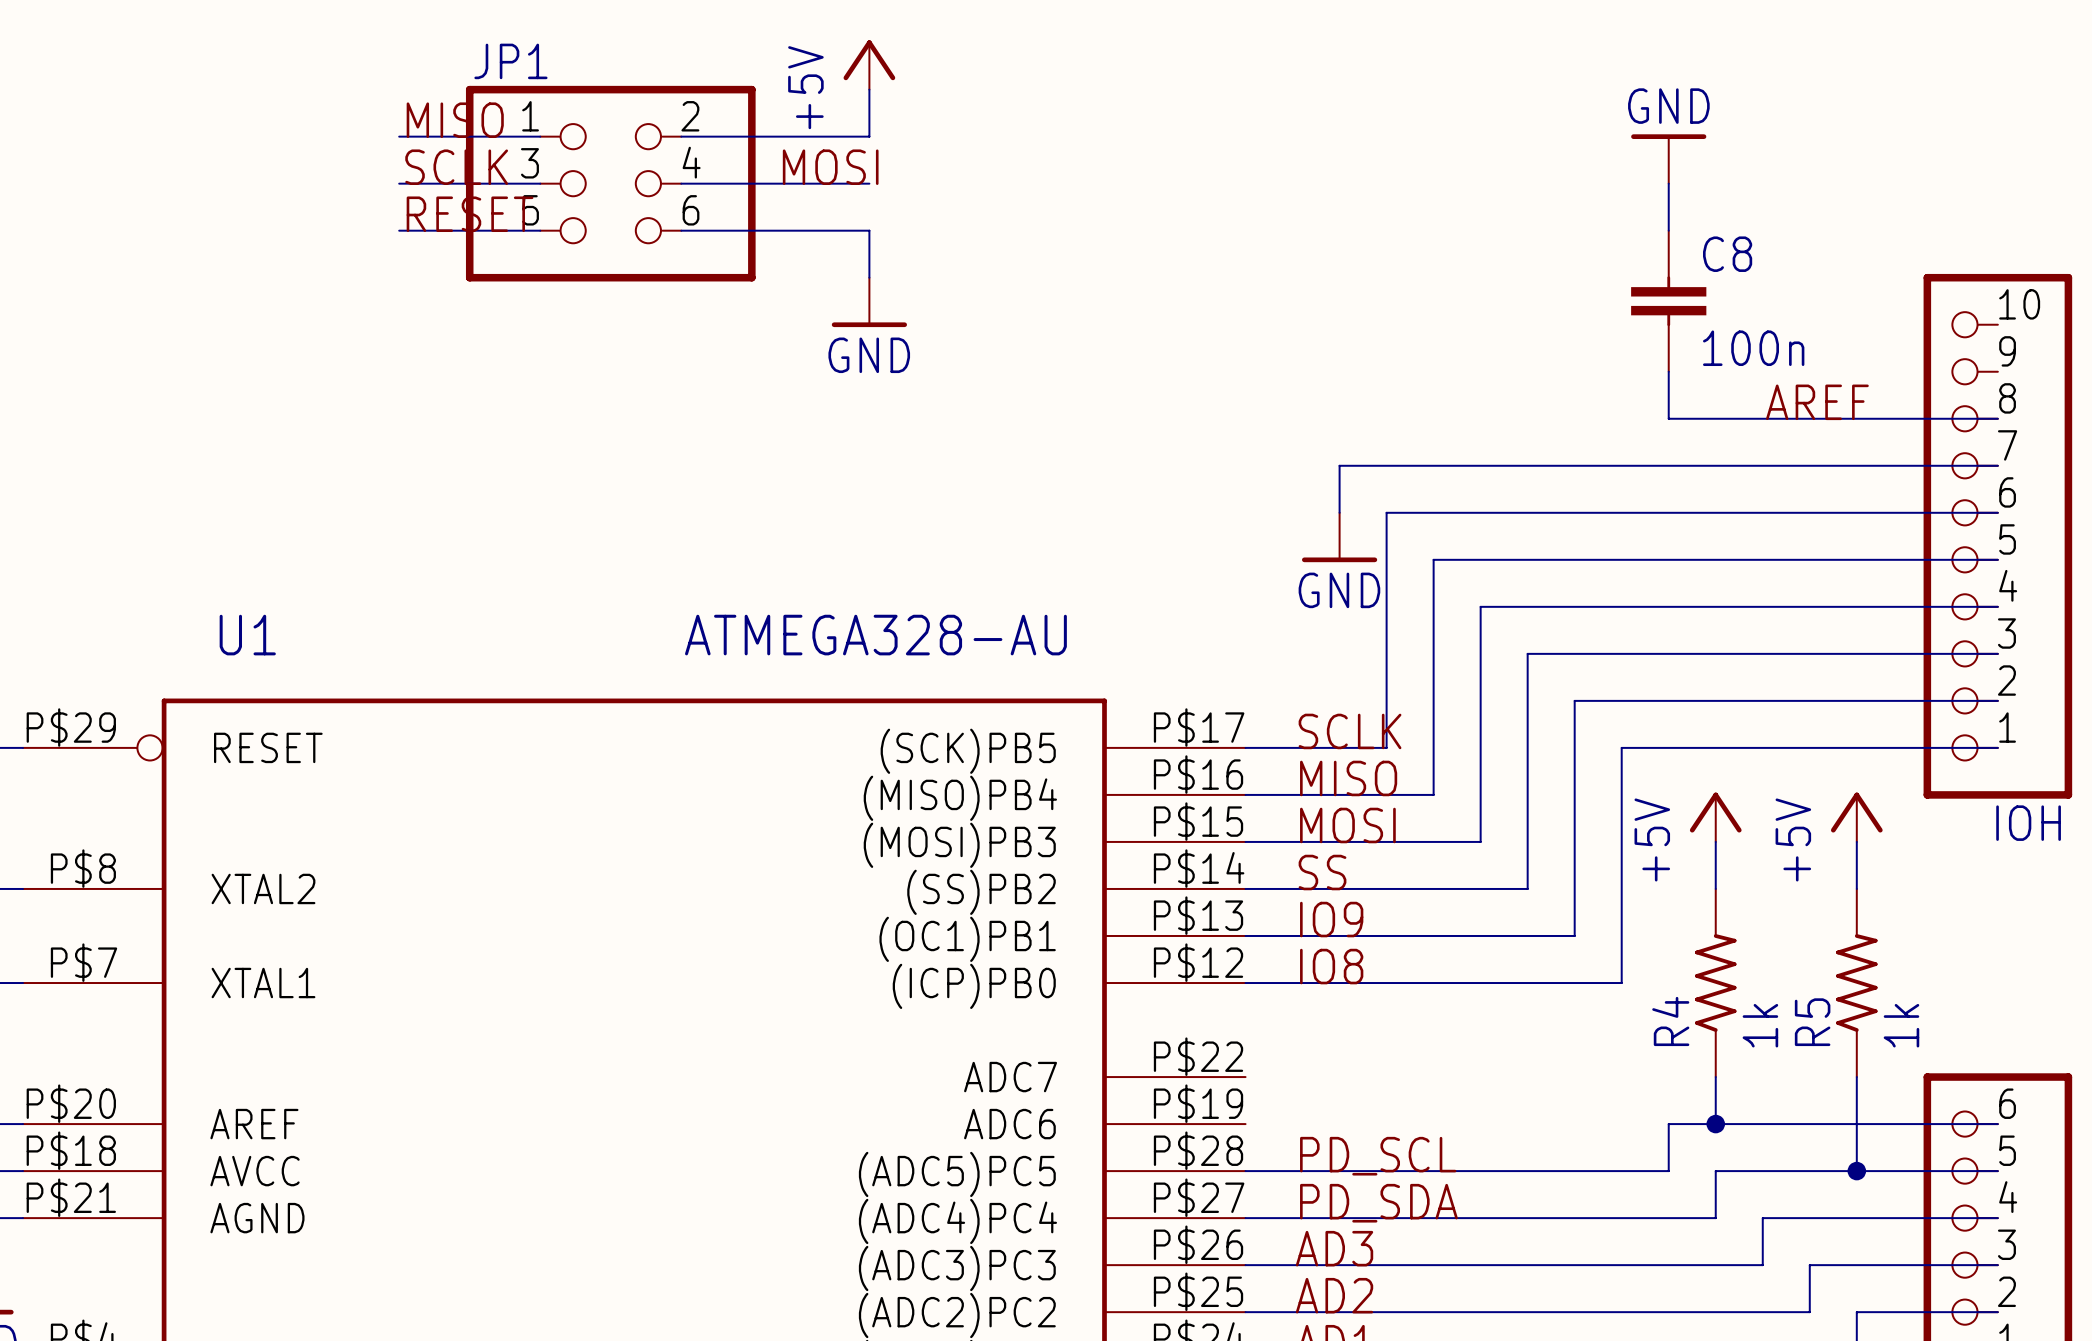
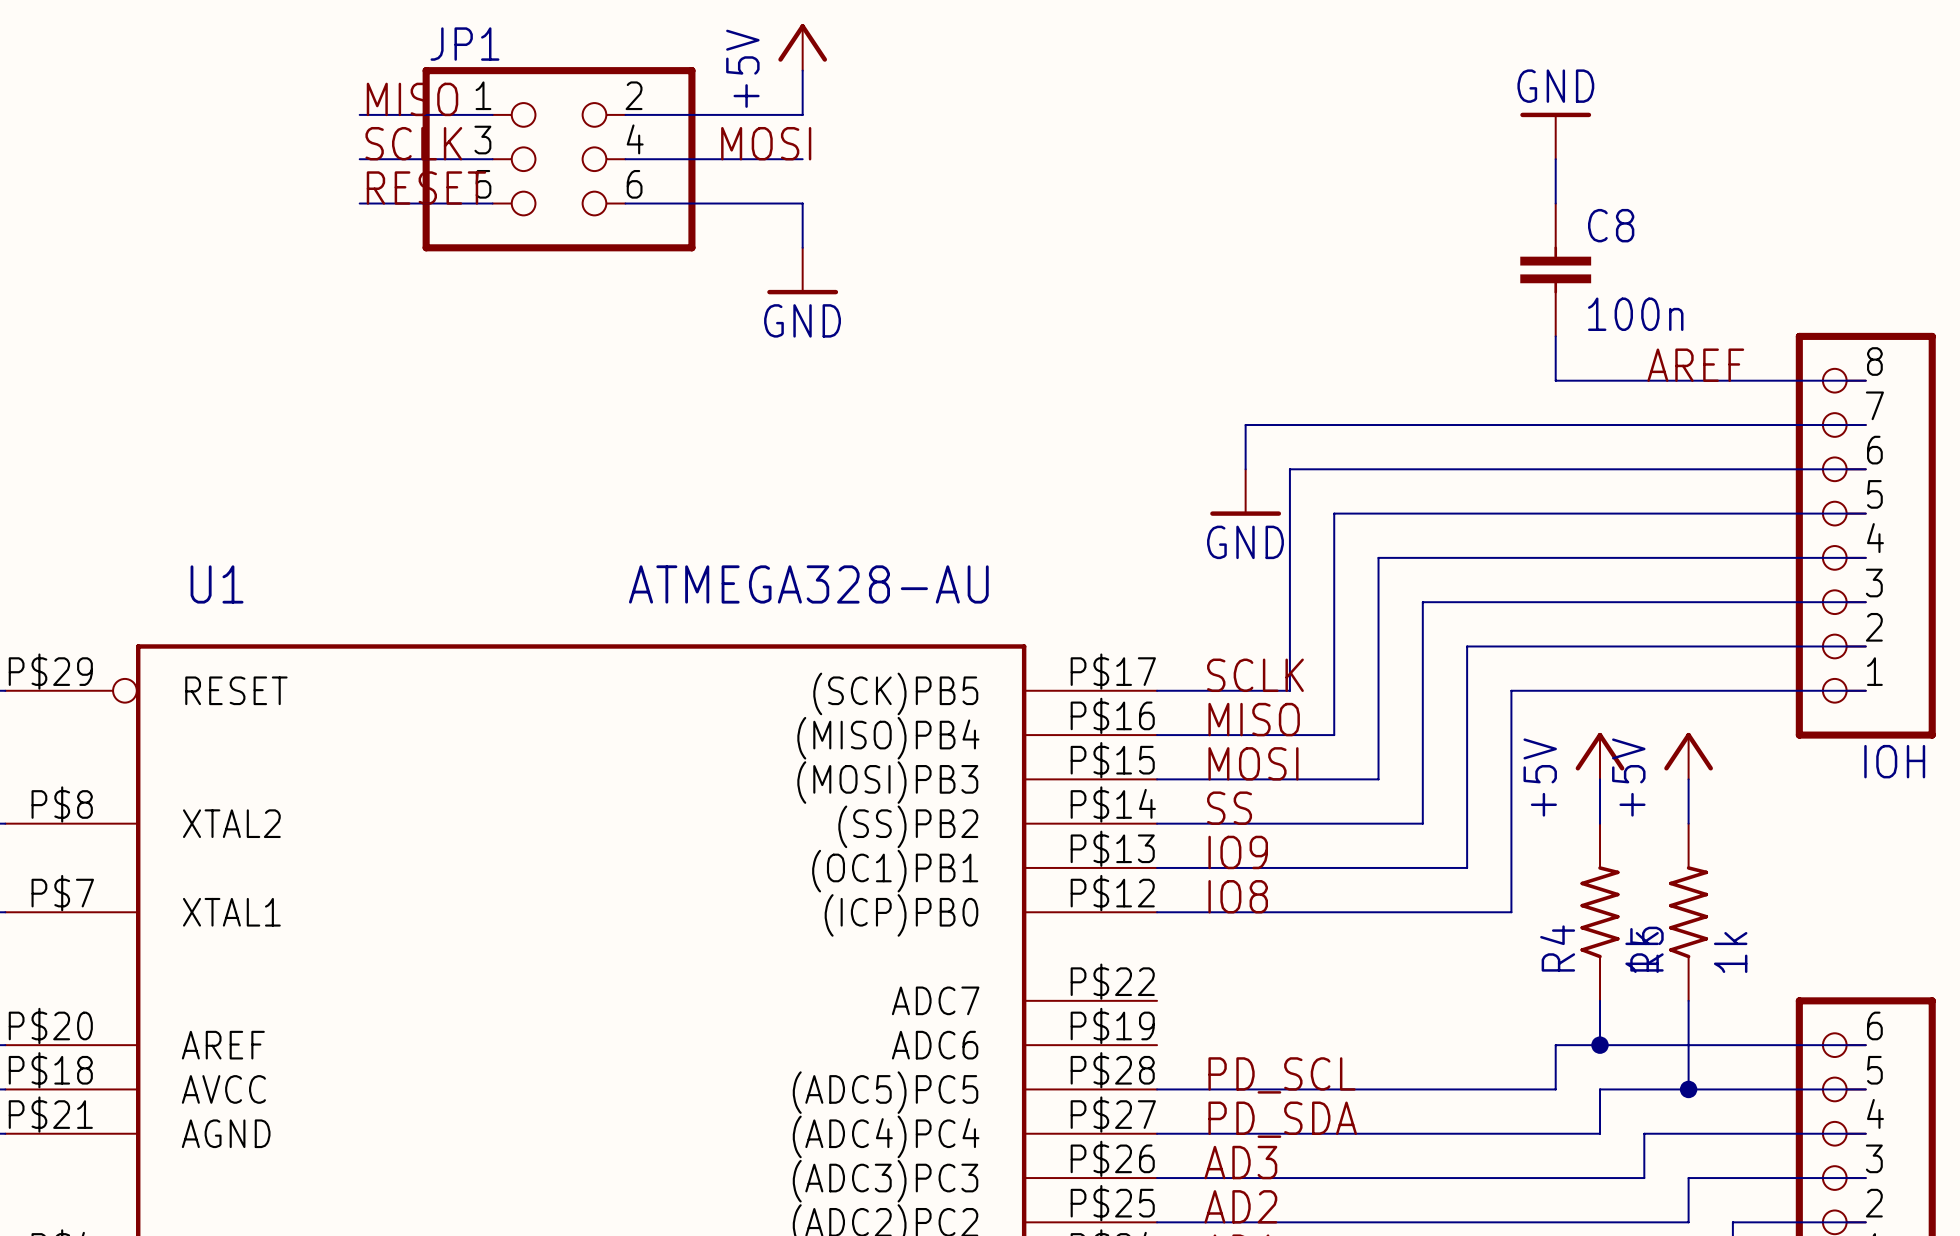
IOH: (1997, 536) -> none
IOH: none -> (1865, 535)
power symbol position: +5V (1856, 817) -> +5V (1688, 756)
wire: (1856, 841) (1856, 888) -> (1688, 779) (1688, 823)
R5 position: (1856, 983) -> (1688, 912)
wire: (1856, 1077) (1856, 1171) -> (1688, 1000) (1688, 1089)
junction position: (1856, 1171) -> (1688, 1089)

